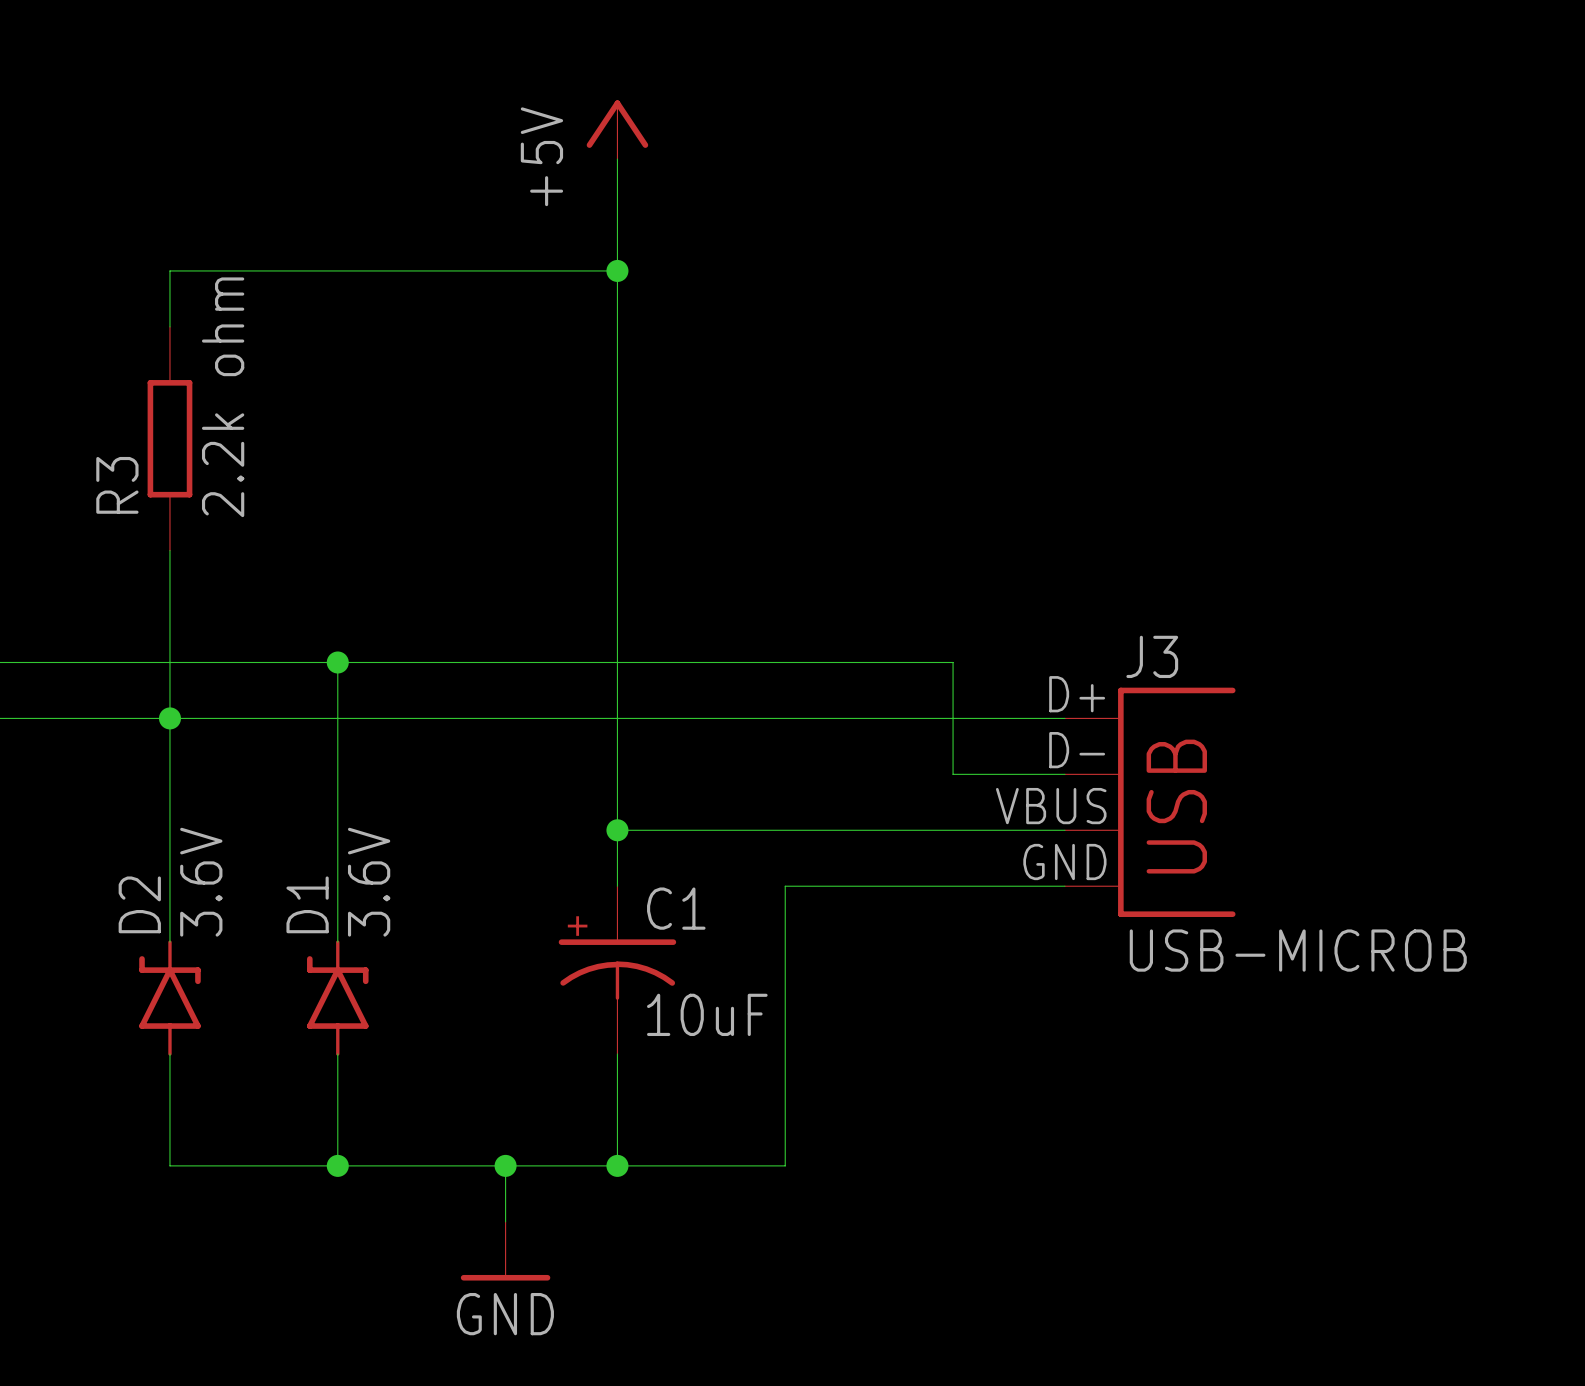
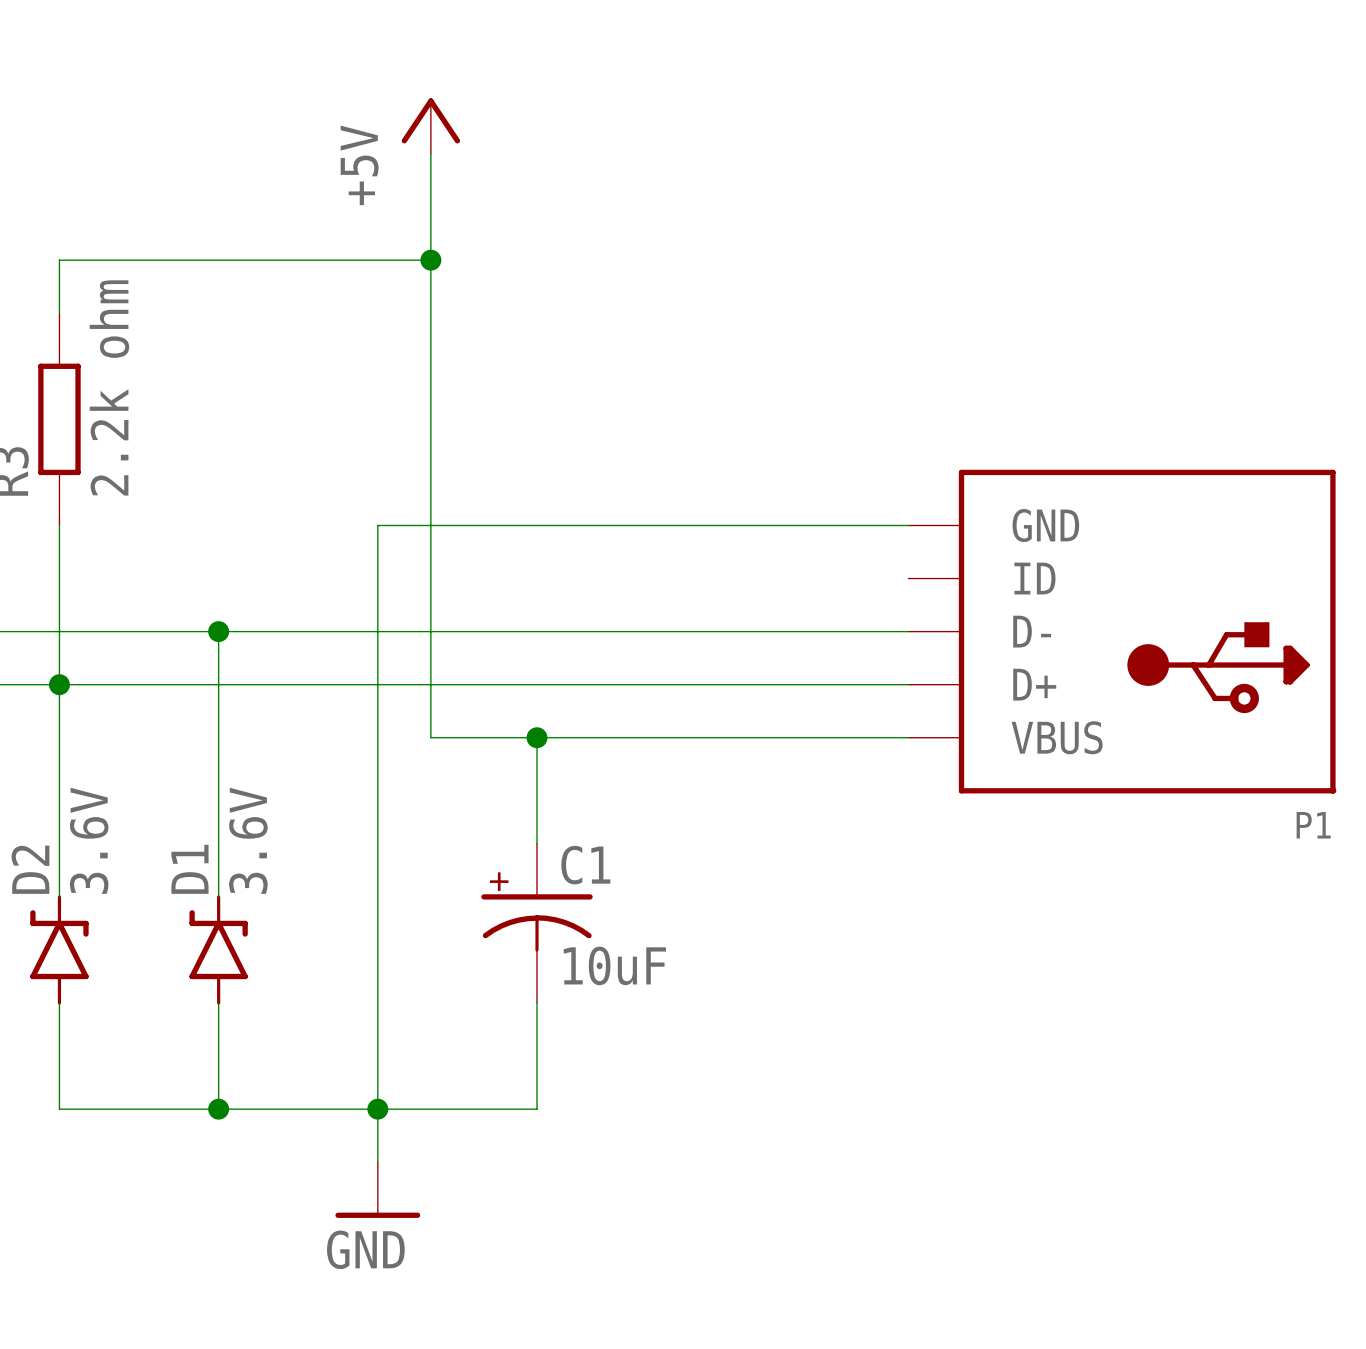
power symbol position: +5V (617, 129) -> +5V (430, 126)
wire: none -> (430, 154) (430, 737) (802, 737)
wire: (617, 159) (617, 886) -> none
wire: (561, 270) (617, 270) -> none
junction position: (617, 270) -> (430, 260)
wire: none -> (908, 525) (377, 525) (377, 1109)
wire: (953, 662) (953, 774) -> (802, 631) (908, 631)
P1: none -> (1122, 631)
J3: USB-MICROB (1150, 802) -> none
wire: (617, 830) (1064, 830) -> none
junction position: (617, 830) -> (537, 737)
wire: (1064, 886) (785, 886) (785, 1165) (673, 1165) -> (537, 1003) (537, 1109)
C1 position: (617, 970) -> (537, 923)
wire: (617, 1054) (617, 1165) -> (537, 737) (537, 843)
junction: (617, 1165) -> none

